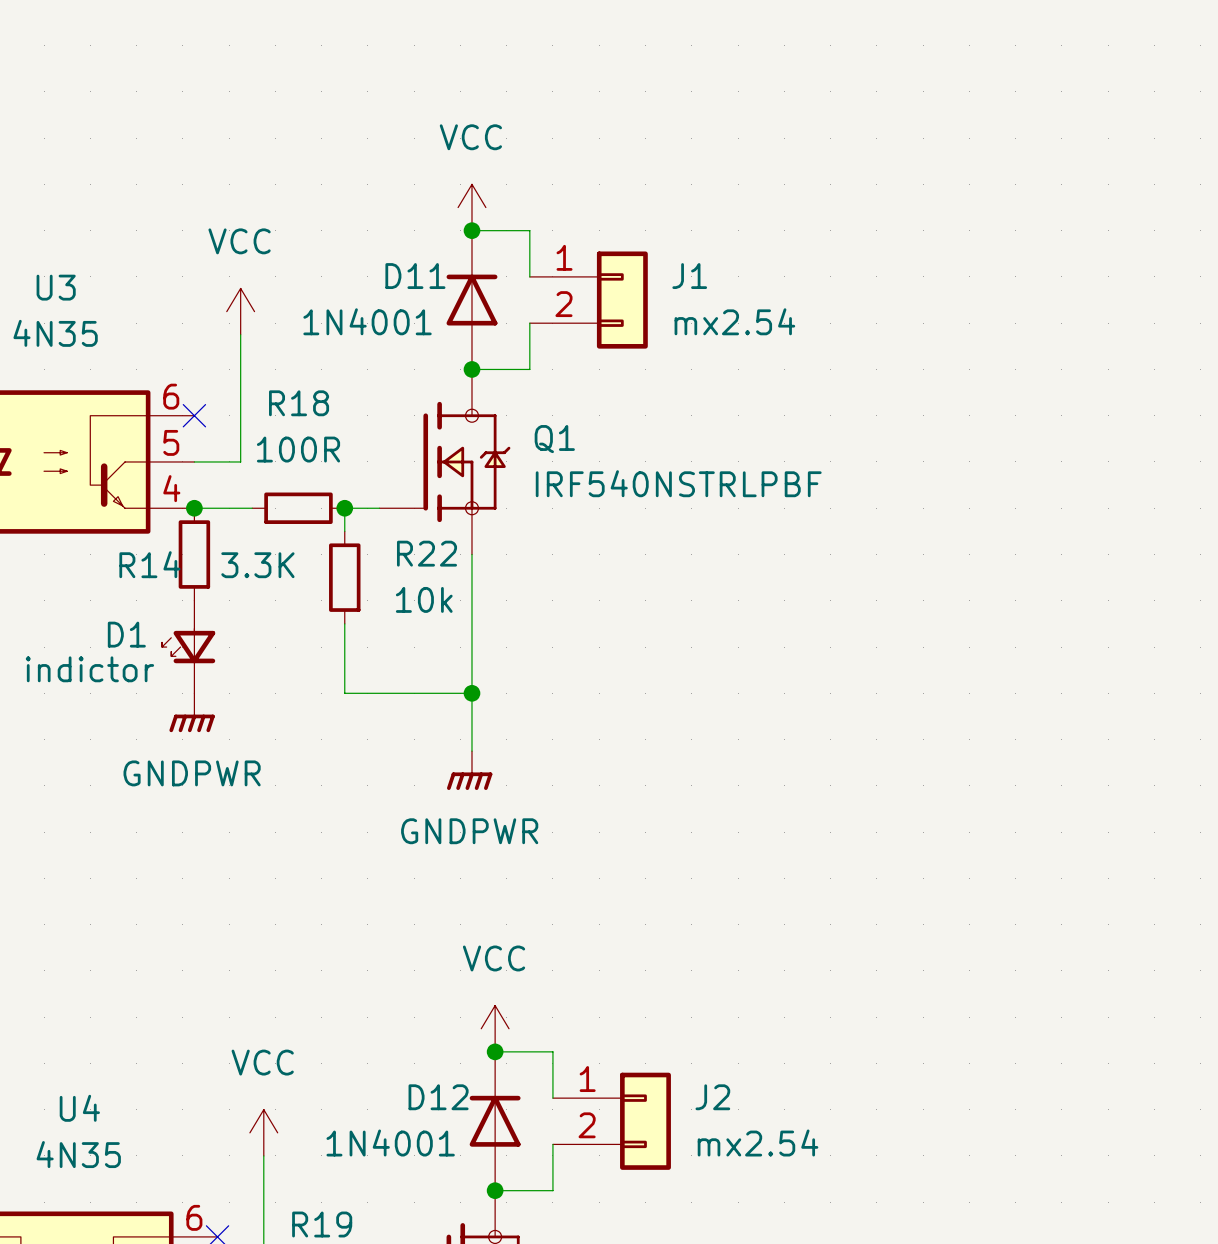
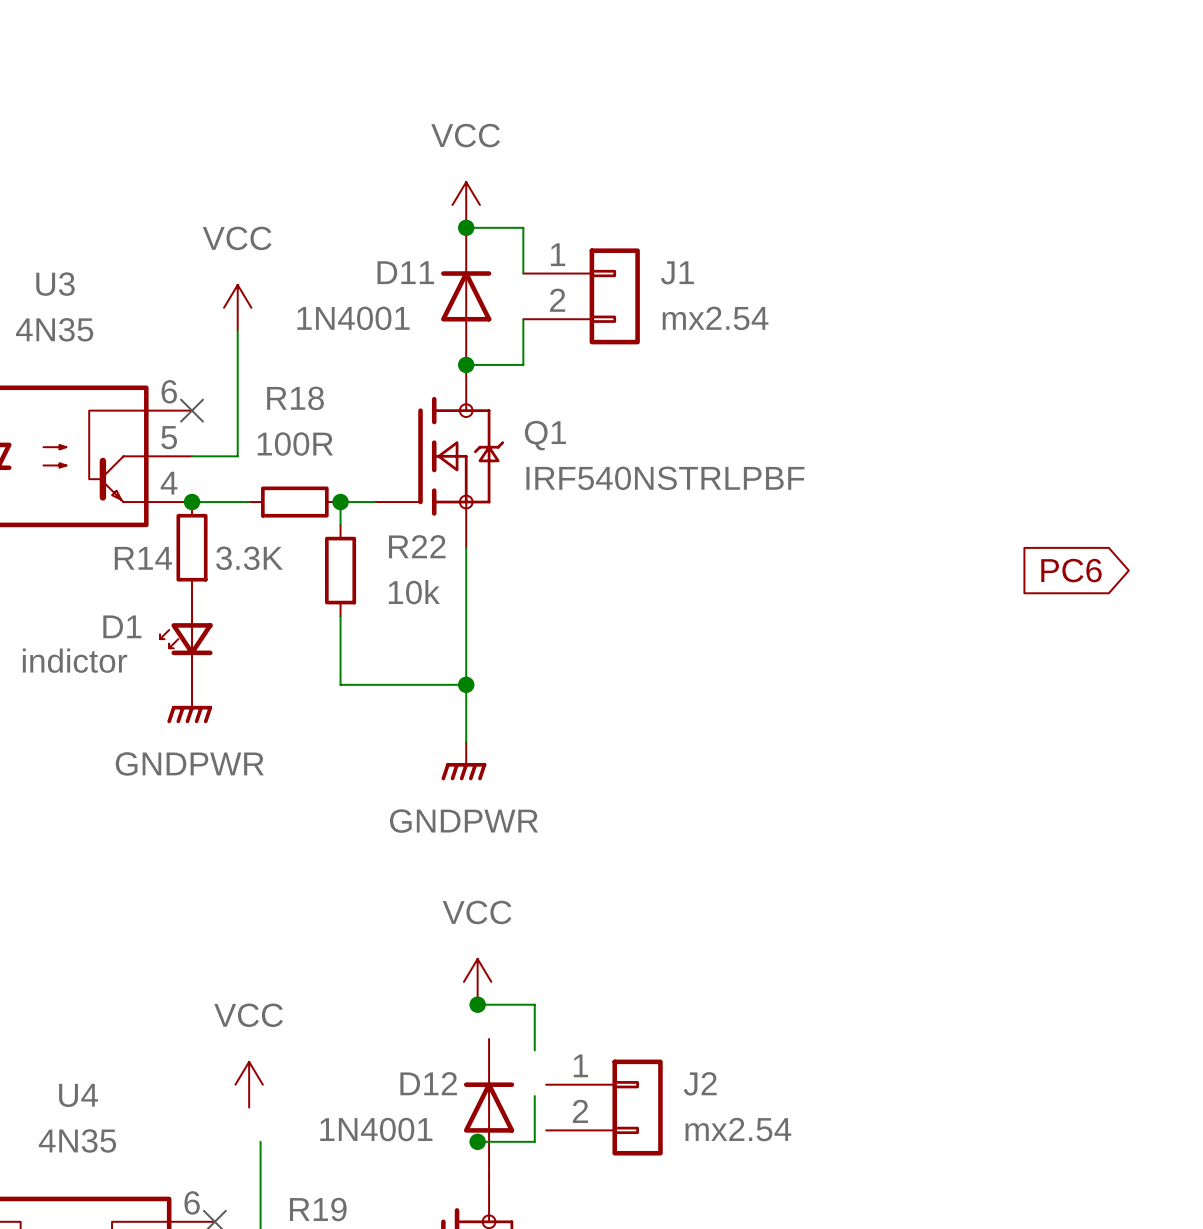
global label: none -> PC6 (1071, 570)
power symbol position: VCC (495, 1028) -> VCC (477, 981)
wire: (495, 1051) (552, 1051) (552, 1098) -> (477, 1004) (534, 1004) (534, 1050)
junction position: (495, 1051) -> (477, 1004)
power symbol position: VCC (263, 1132) -> VCC (249, 1084)
wire: (552, 1144) (552, 1190) (495, 1190) -> (534, 1096) (534, 1141) (477, 1141)
junction position: (495, 1190) -> (477, 1141)

